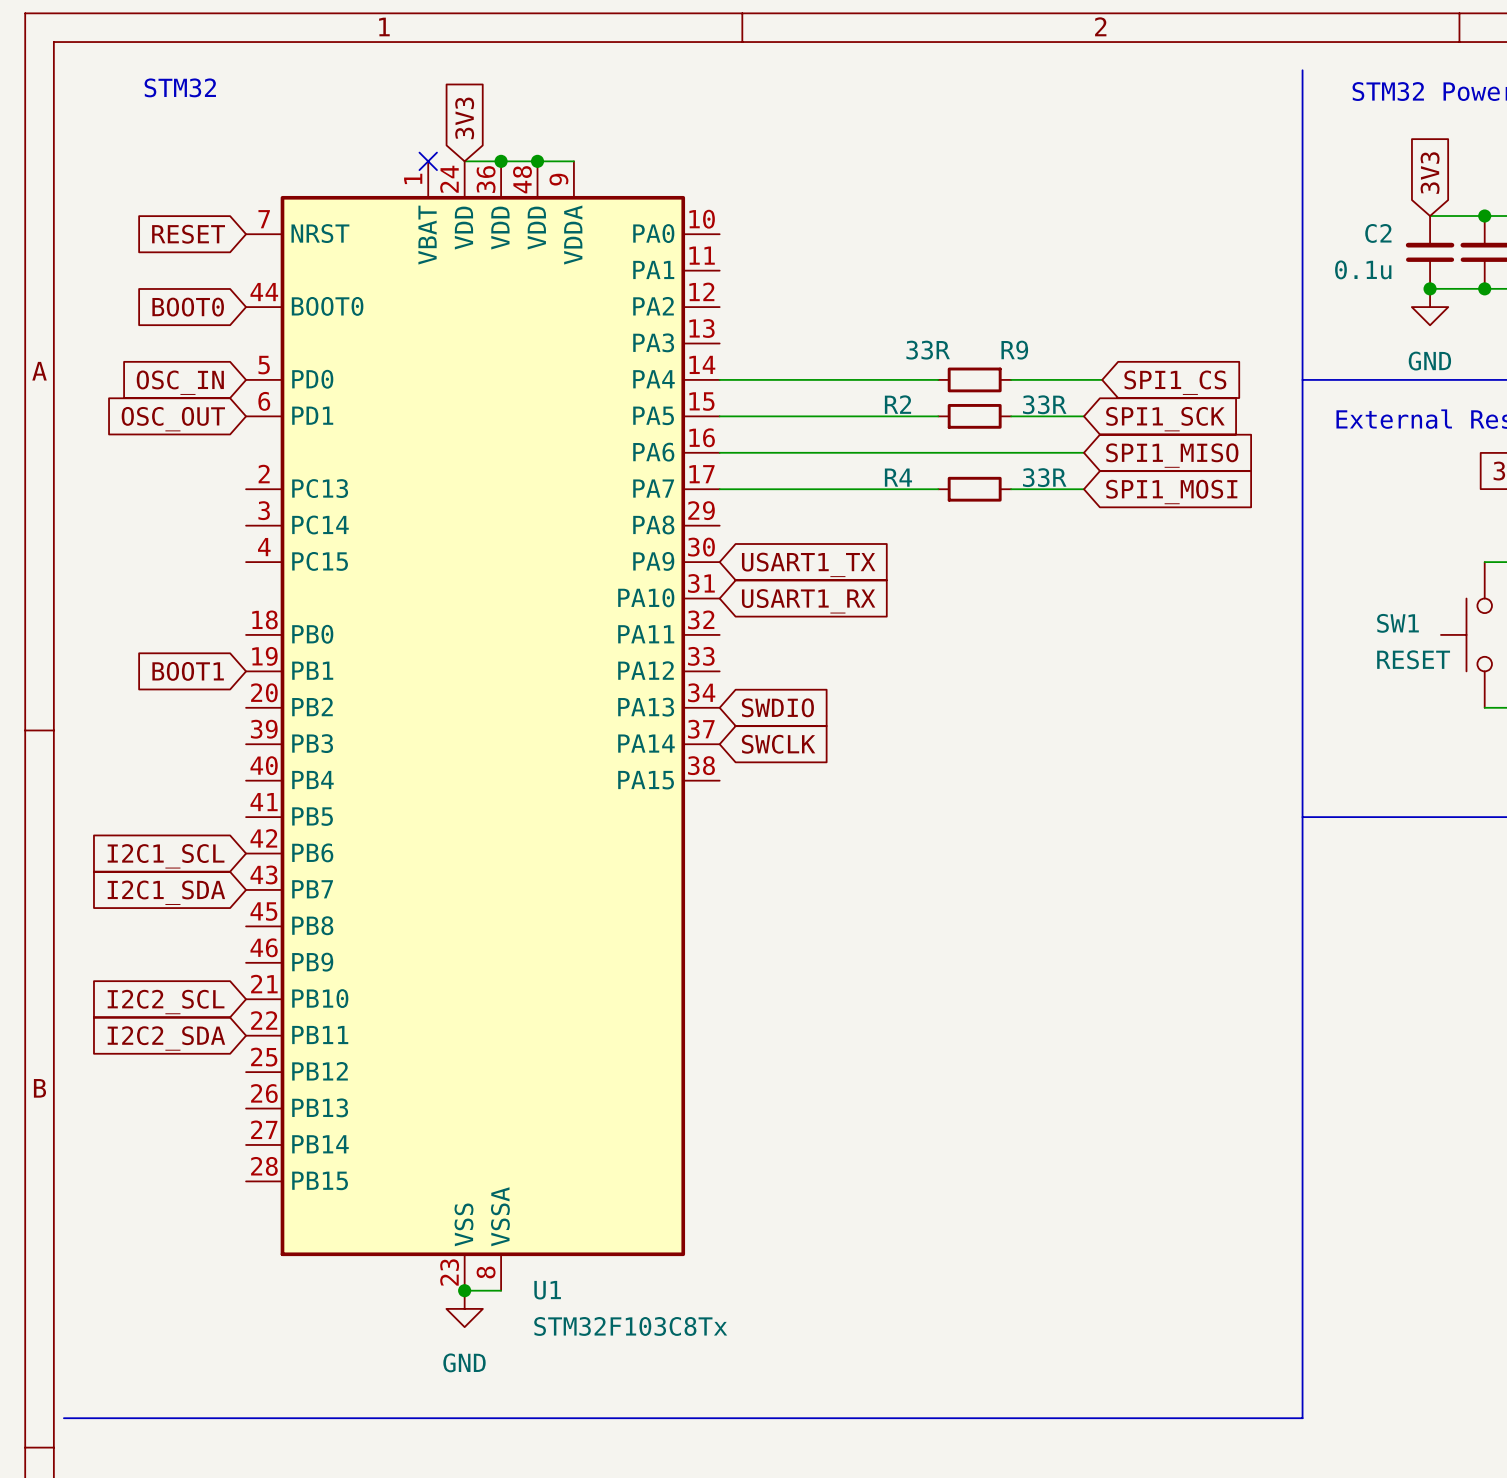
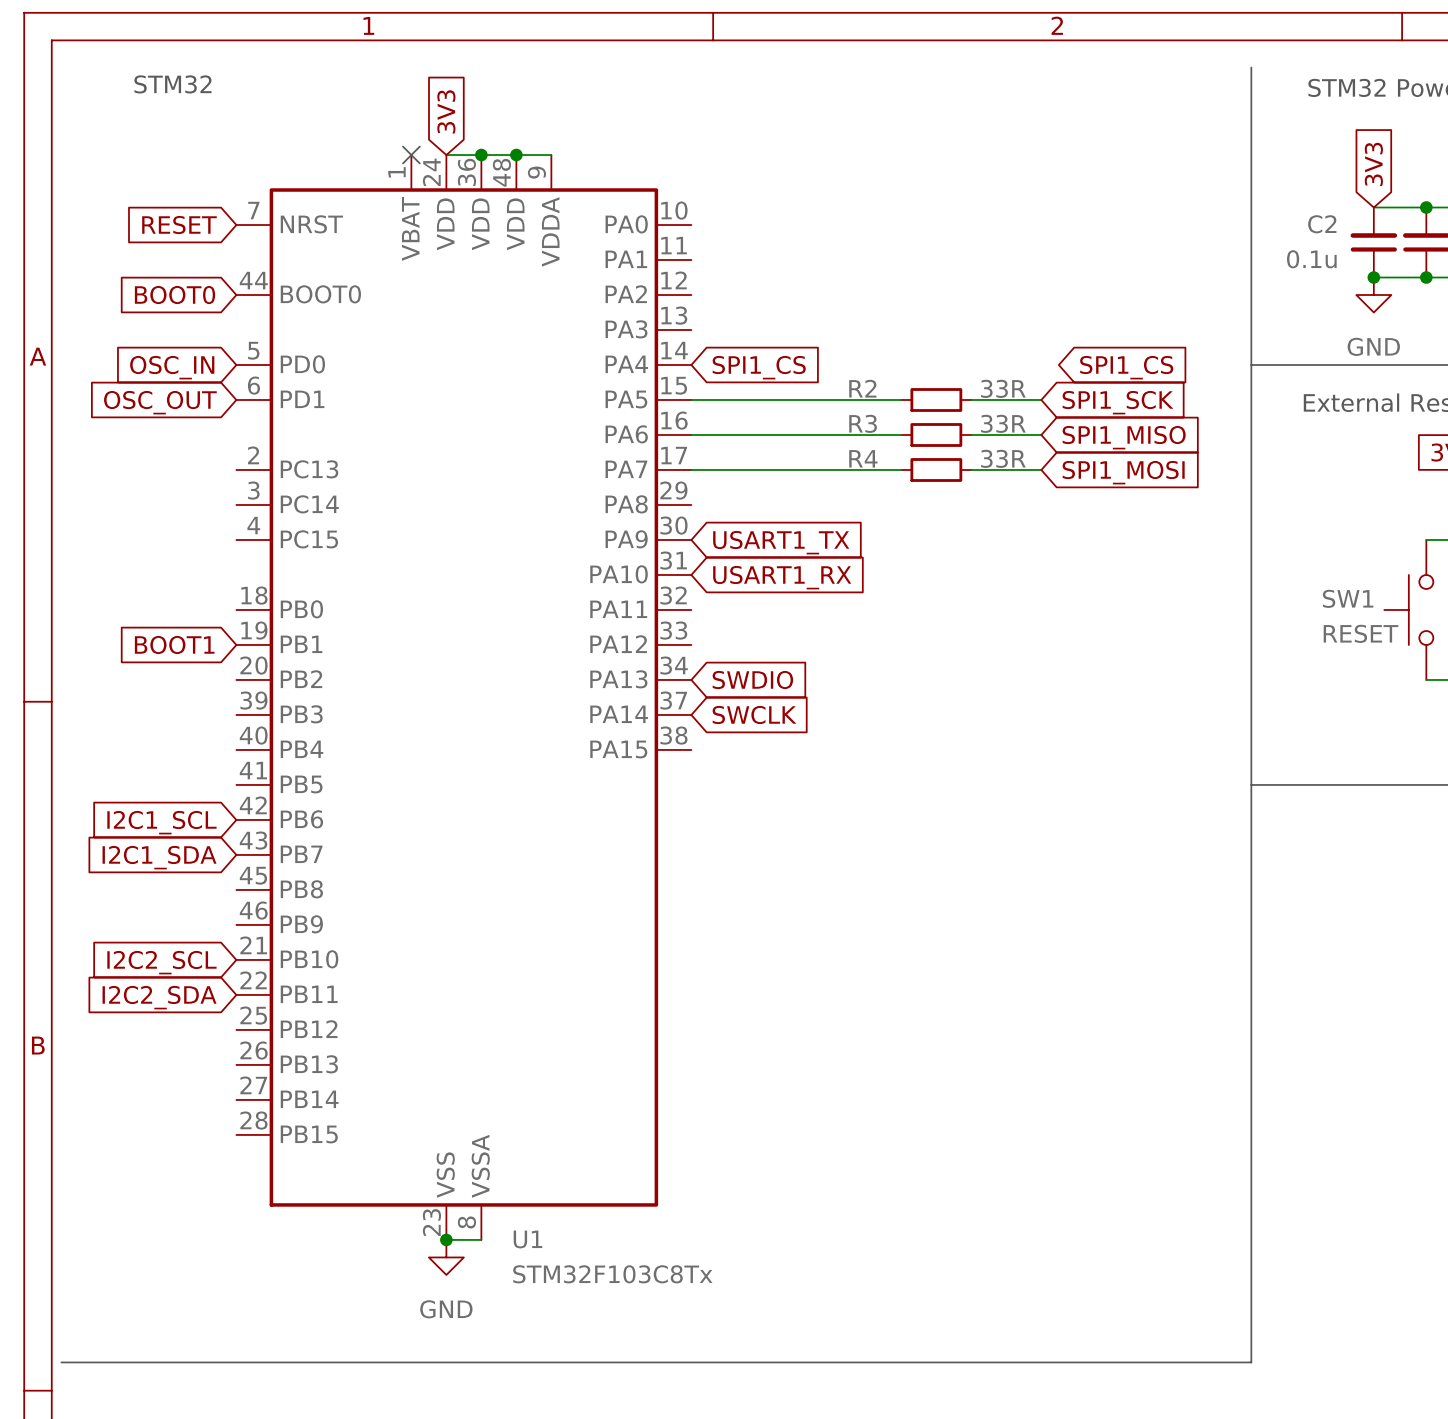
wire: (719, 379) (938, 379) -> none
R9: 33R (974, 379) -> none
wire: (1011, 379) (1102, 379) -> none
global label: none -> SPI1_CS (759, 367)
wire: (938, 452) (1011, 452) -> none
R3: none -> 33R (936, 435)

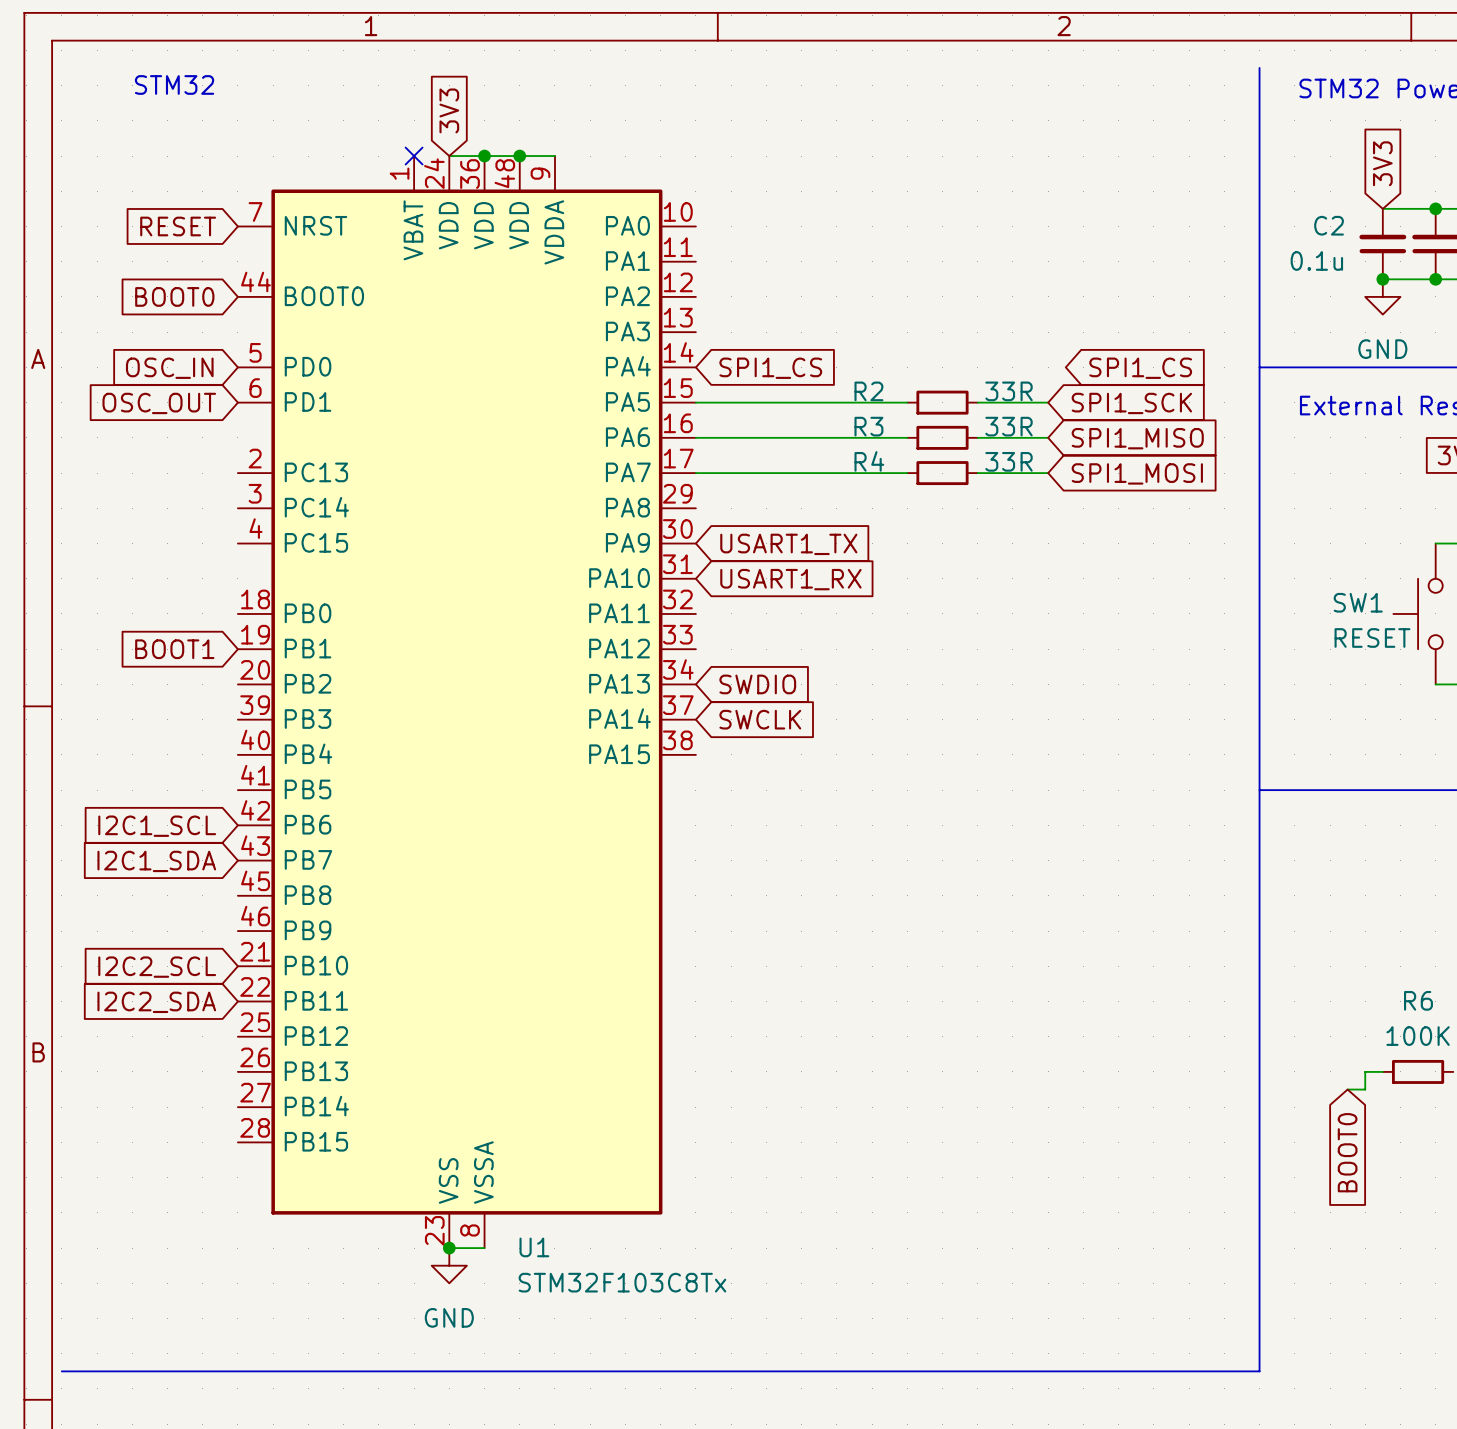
wire: none -> (1382, 1071) (1365, 1071) (1365, 1089) (1347, 1089)
R6: none -> 100K (1418, 1071)
global label: none -> BOOT0 (1347, 1152)

